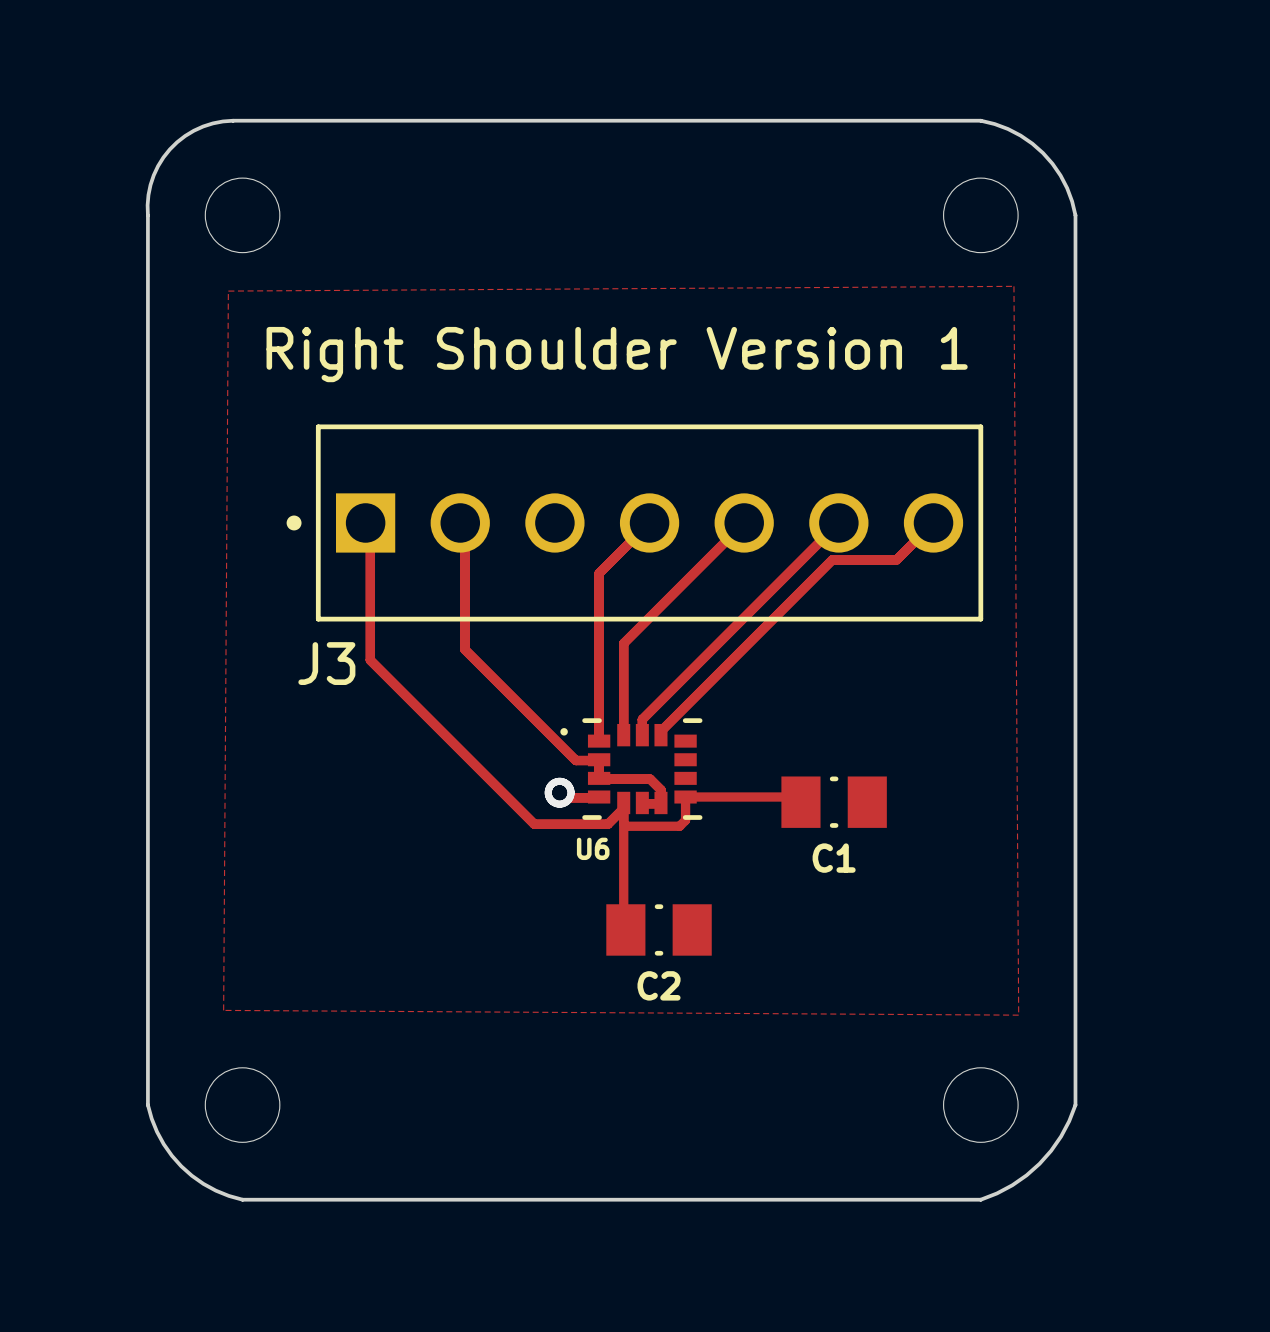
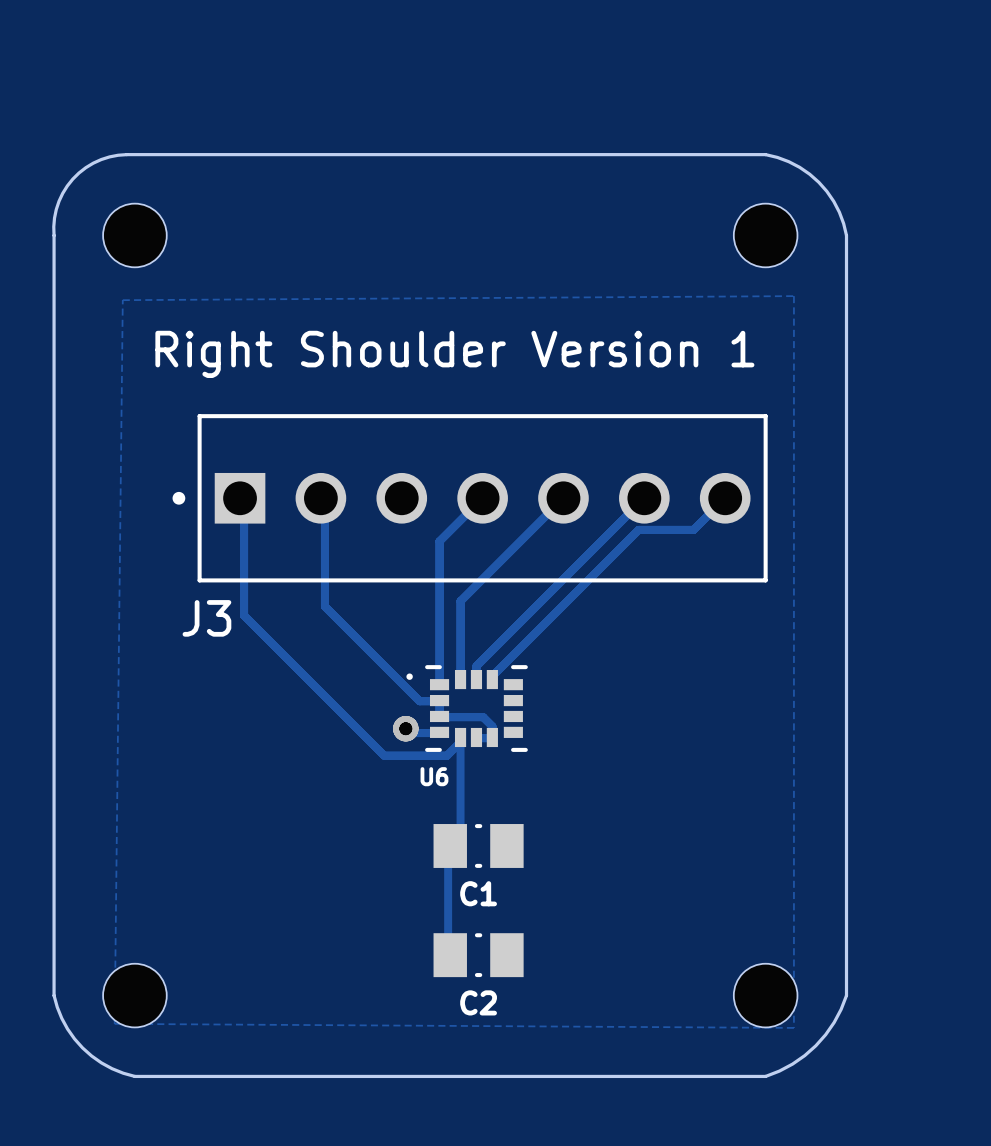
zone outline: (1013, 286) (1018, 1015) (223, 1010) (228, 291) -> (793, 296) (793, 1027) (114, 1023) (122, 300)
track: (800, 802) (795, 797) (685, 797) (685, 820) (679, 826) (626, 826) (623, 823) -> none
C1 position: (834, 802) -> (478, 845)
C2 position: (659, 929) -> (478, 955)
track: none -> (448, 849) (448, 951)

